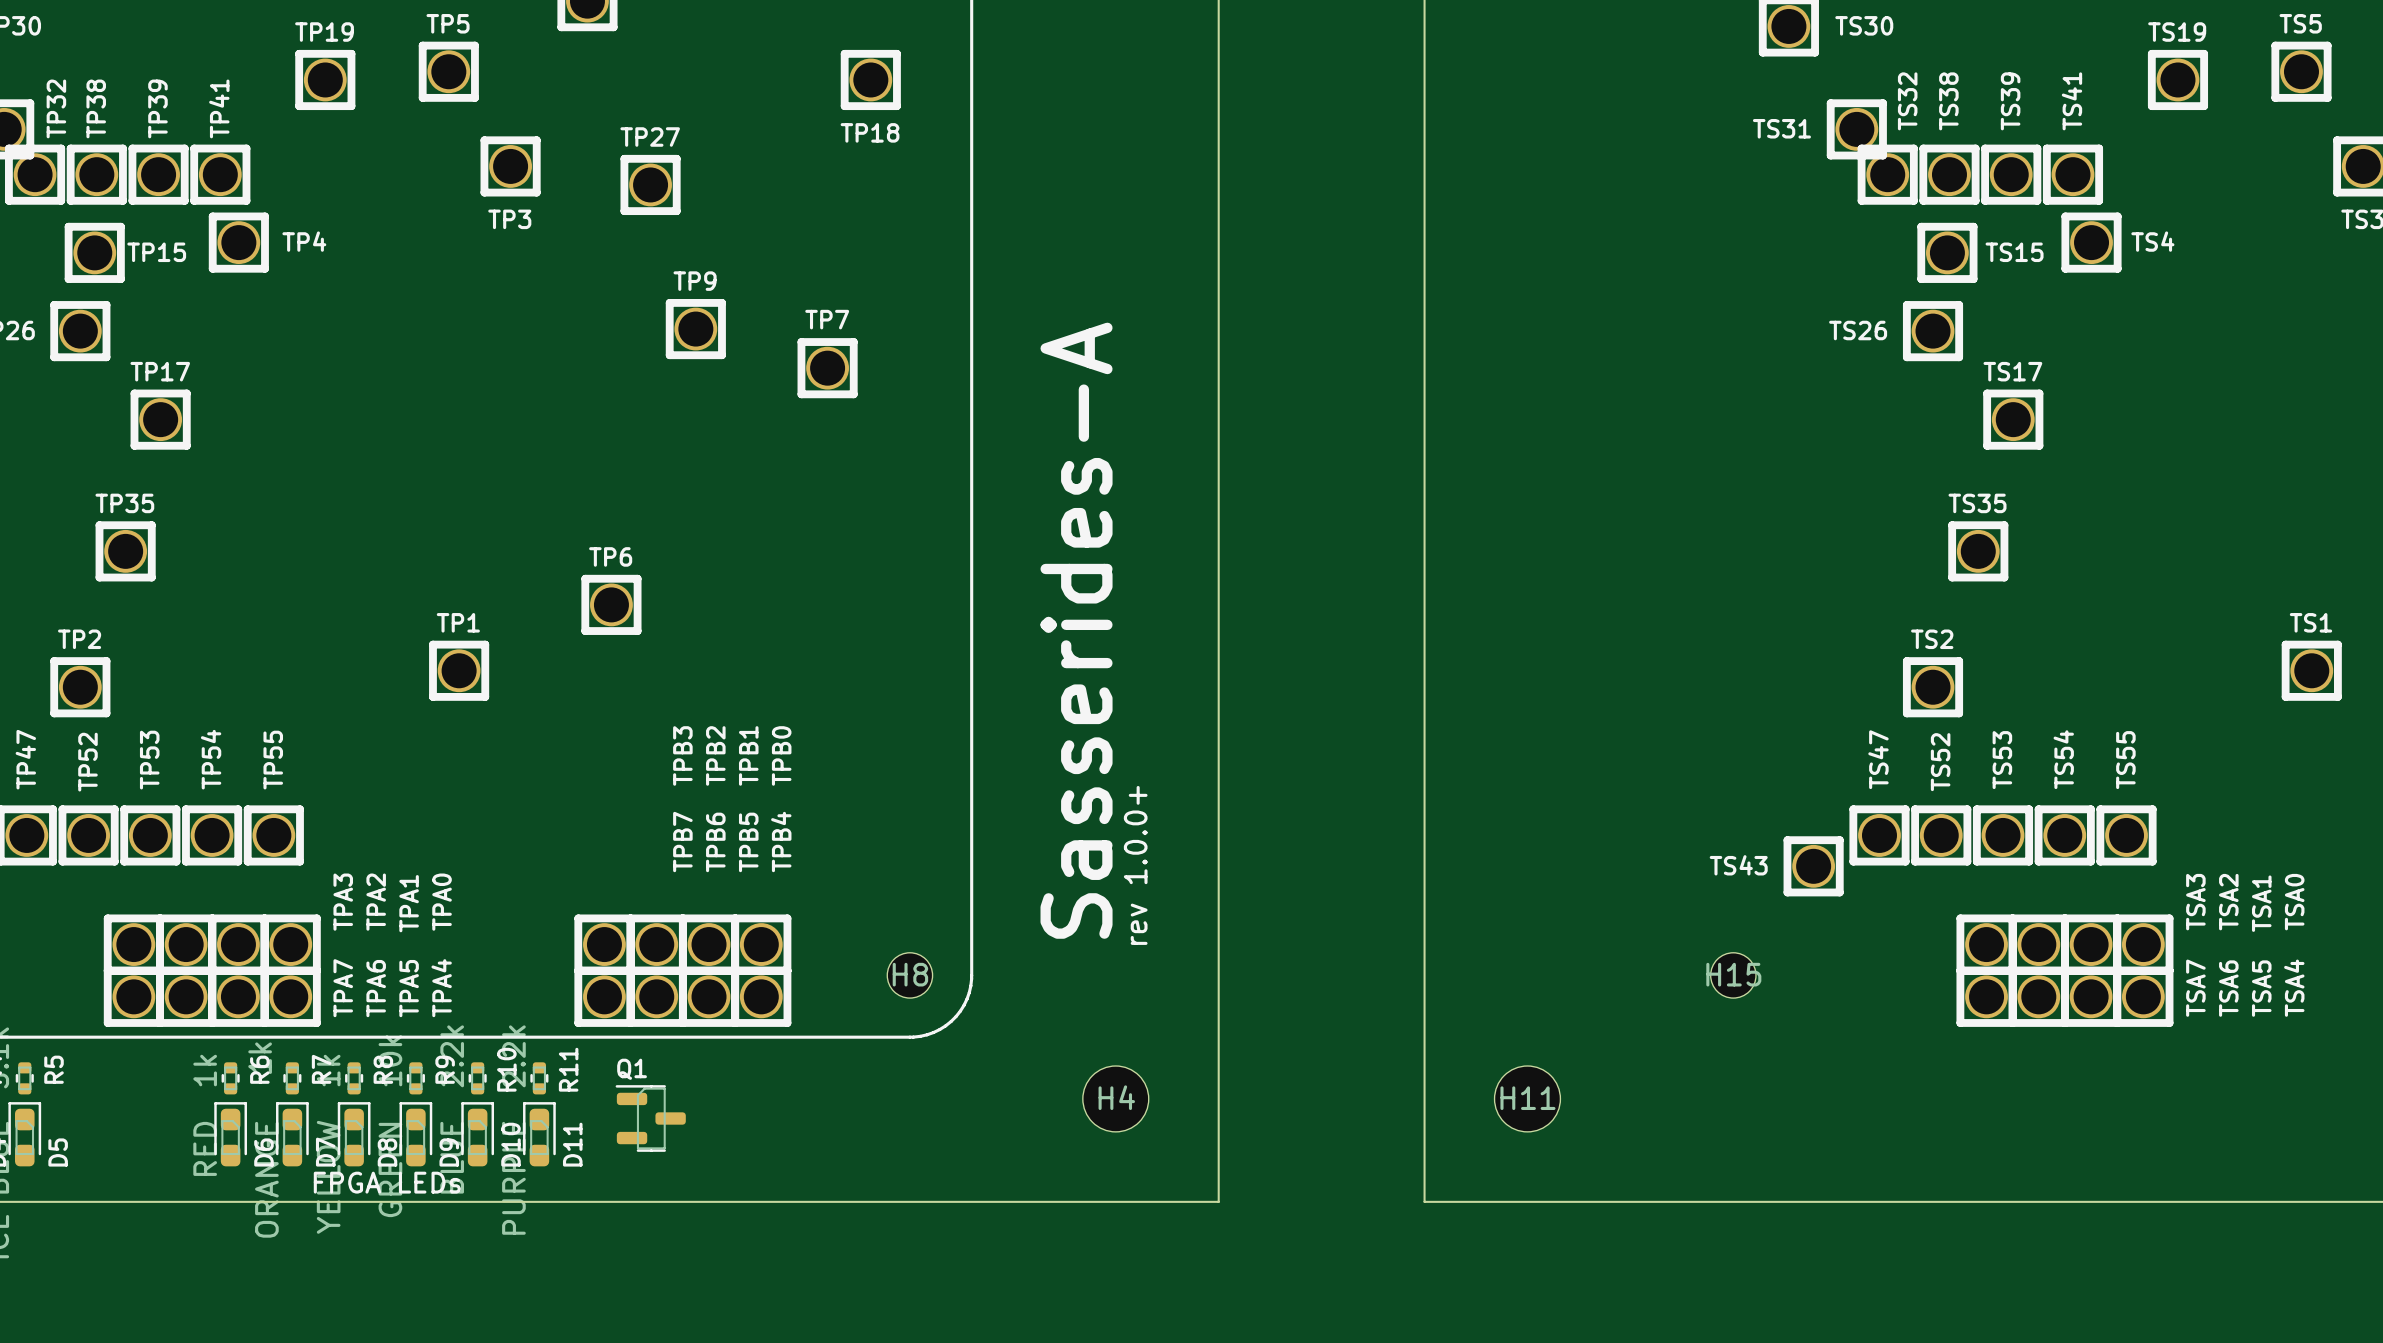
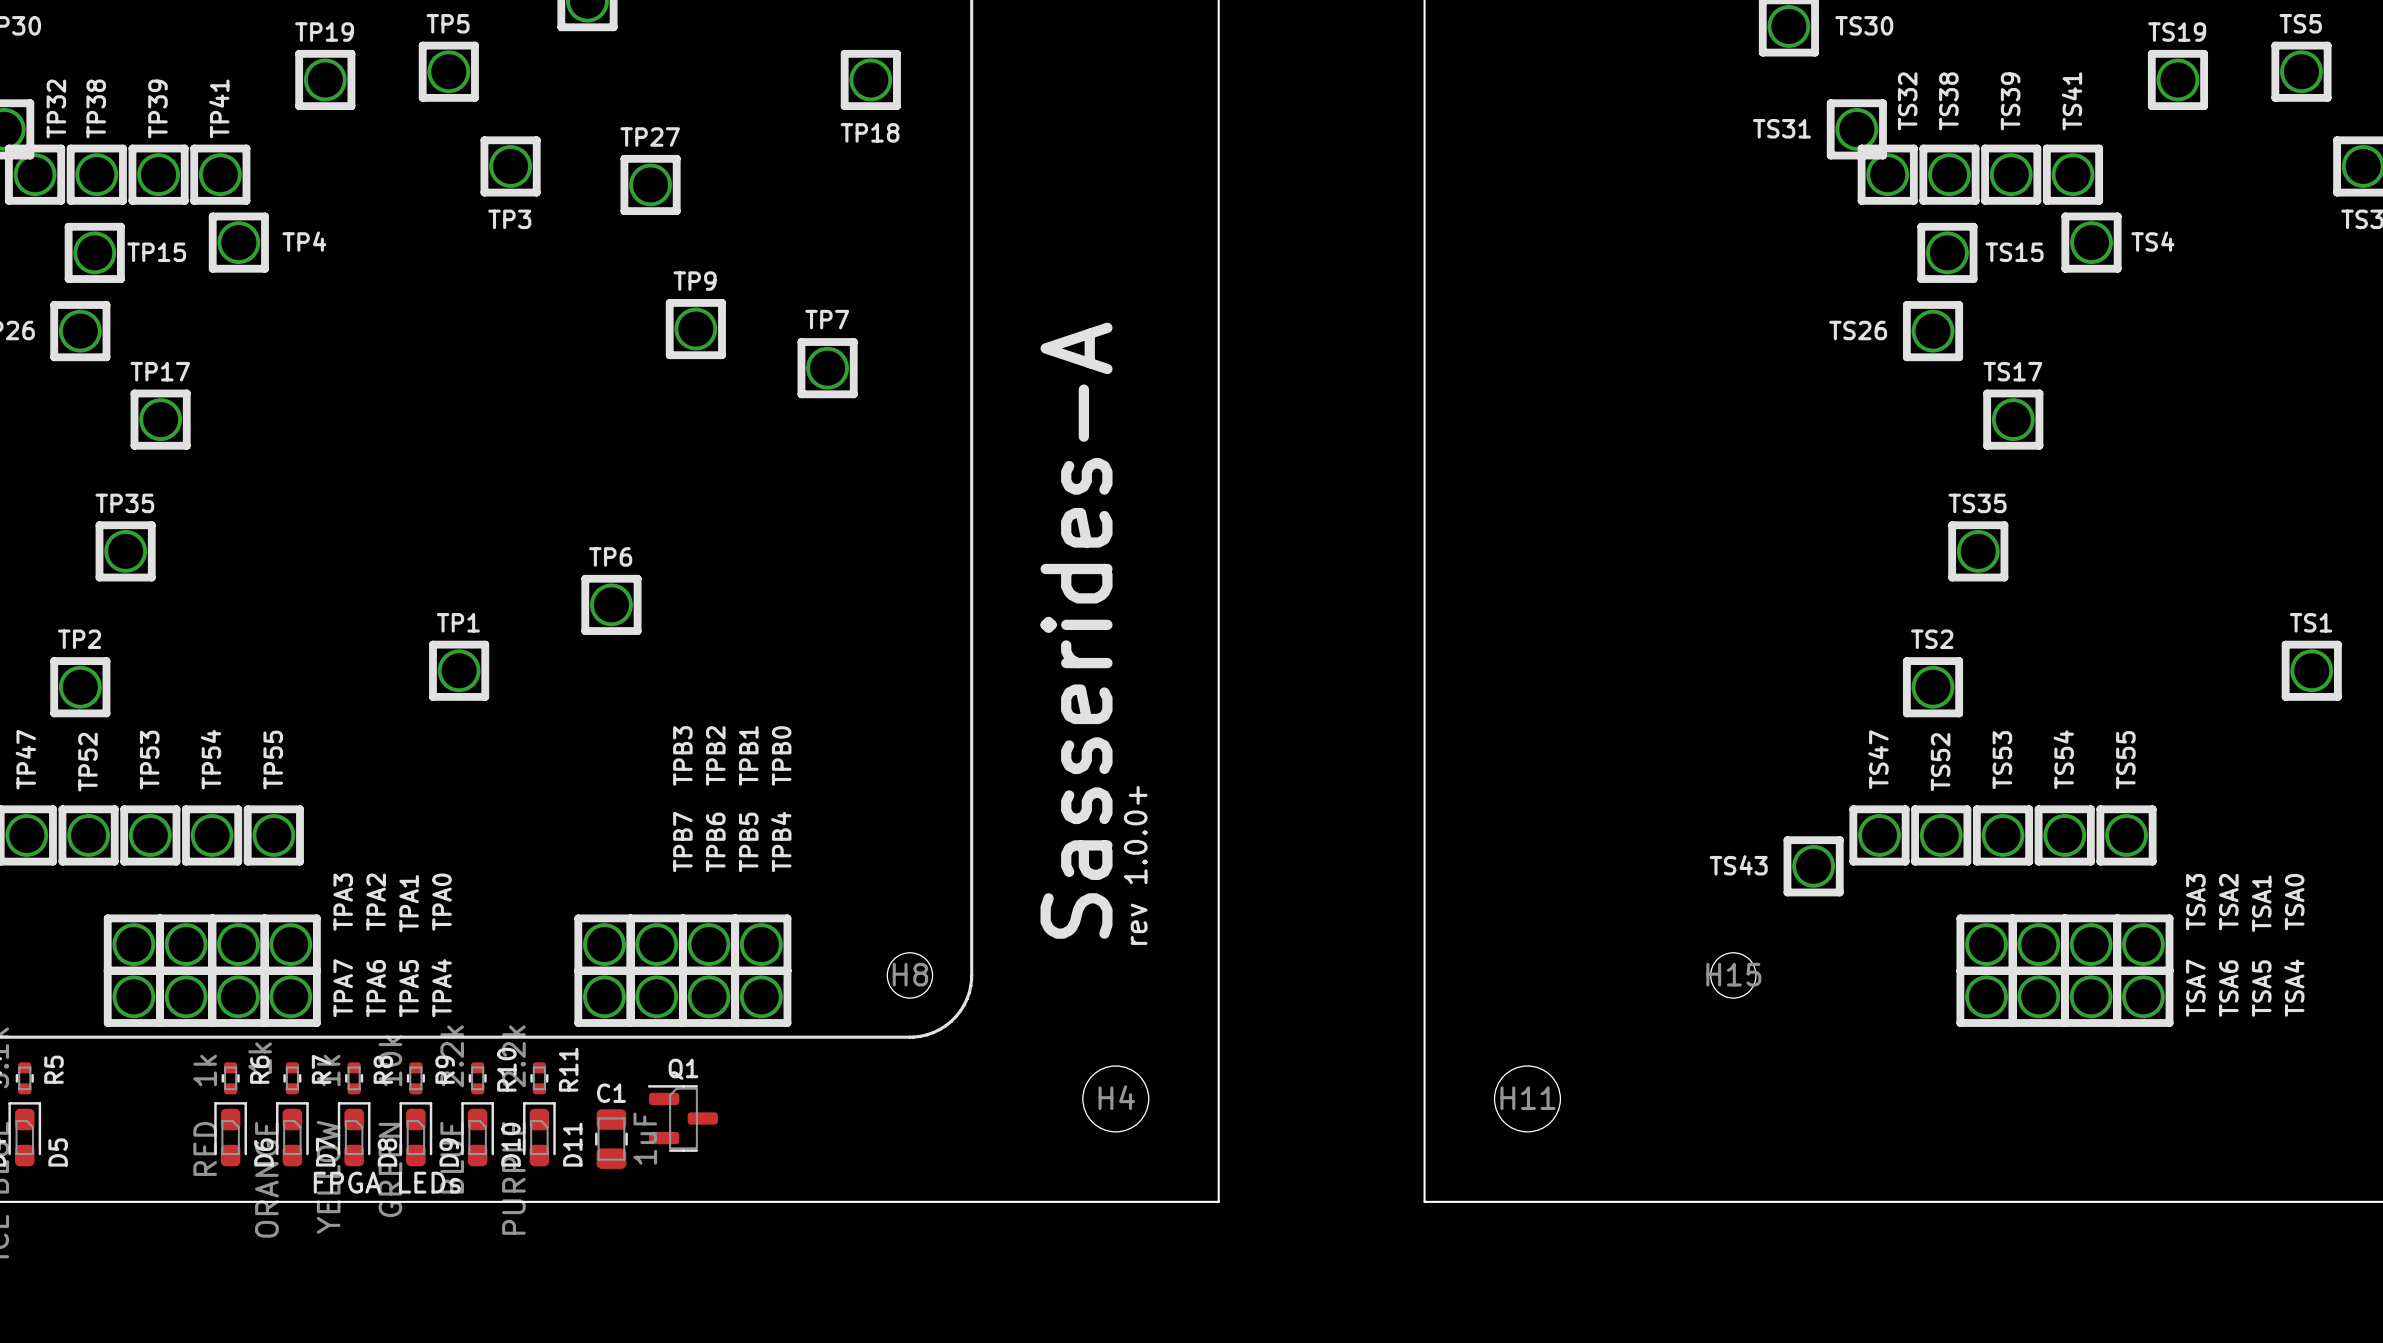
Q1 name position: Q1 (632, 1069) -> Q1 (683, 1069)
Q1 position: (650, 1118) -> (682, 1118)
C1: none -> 1uF (611, 1139)

